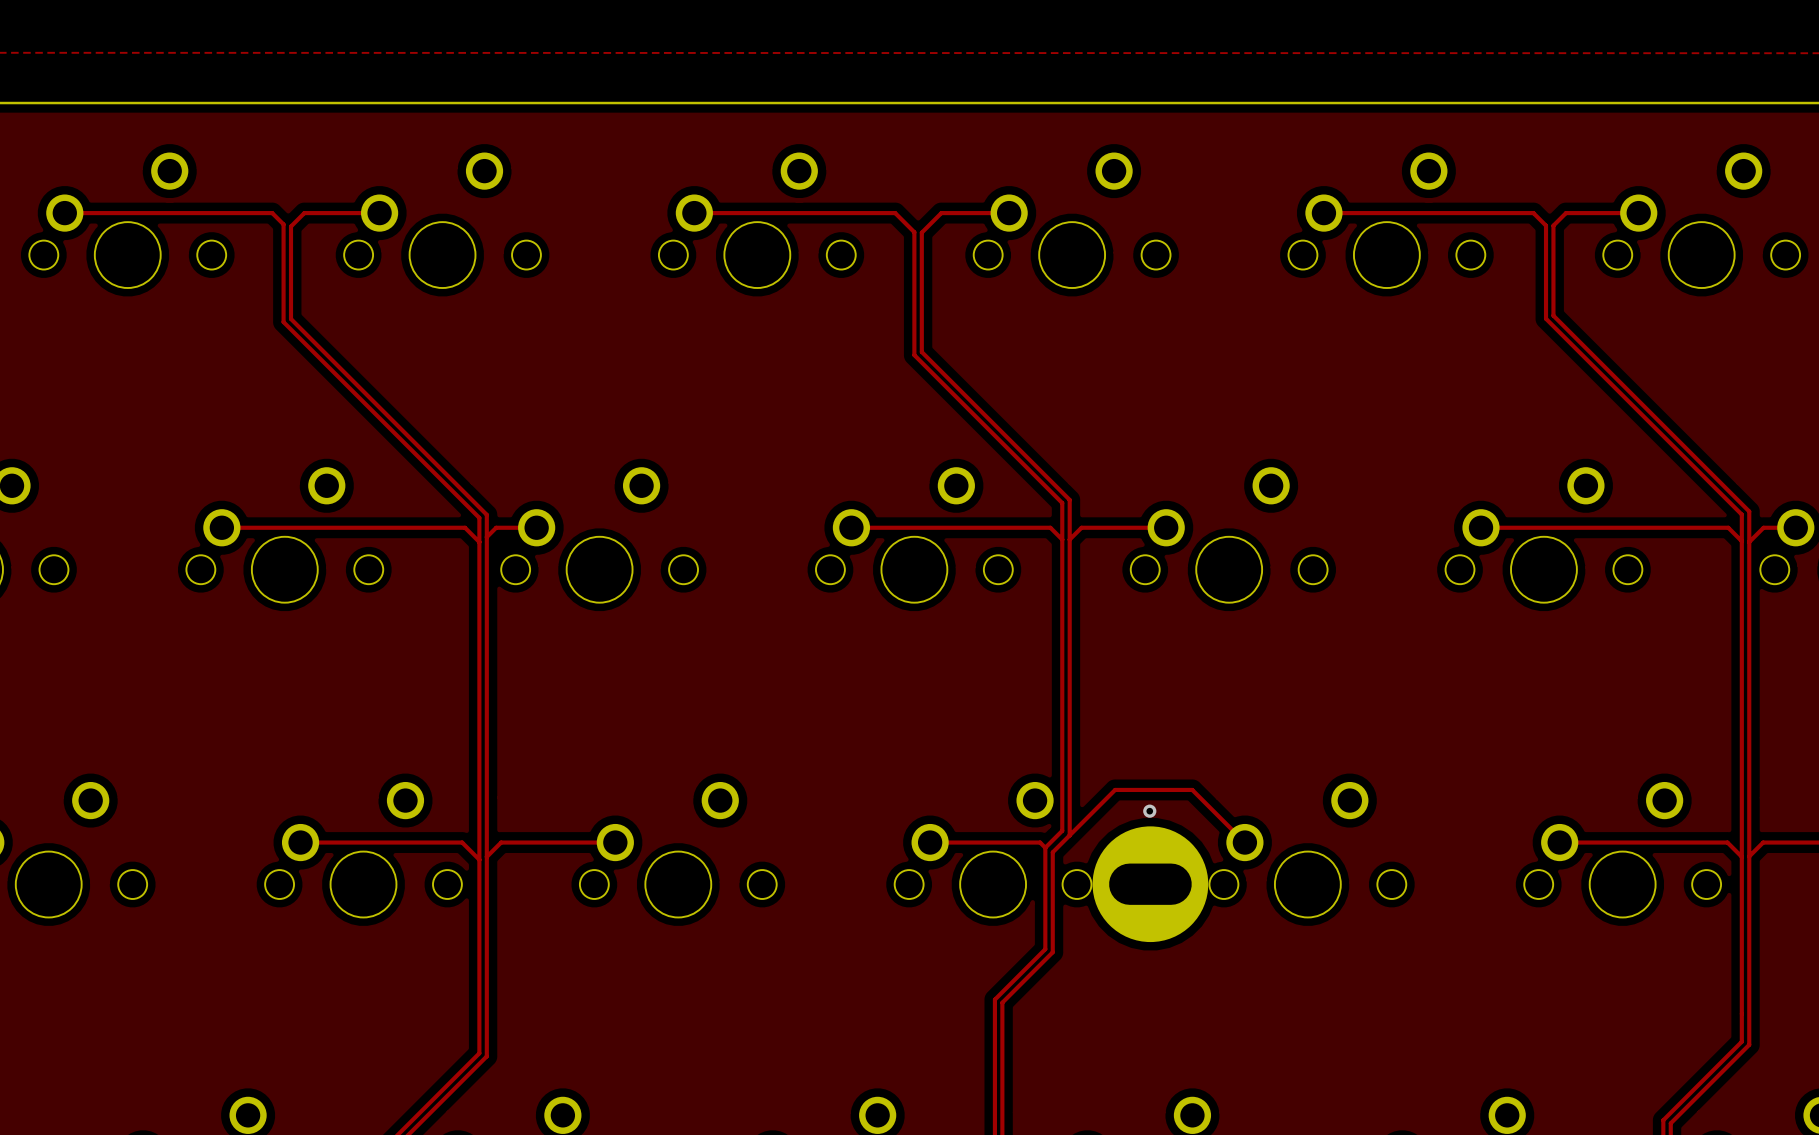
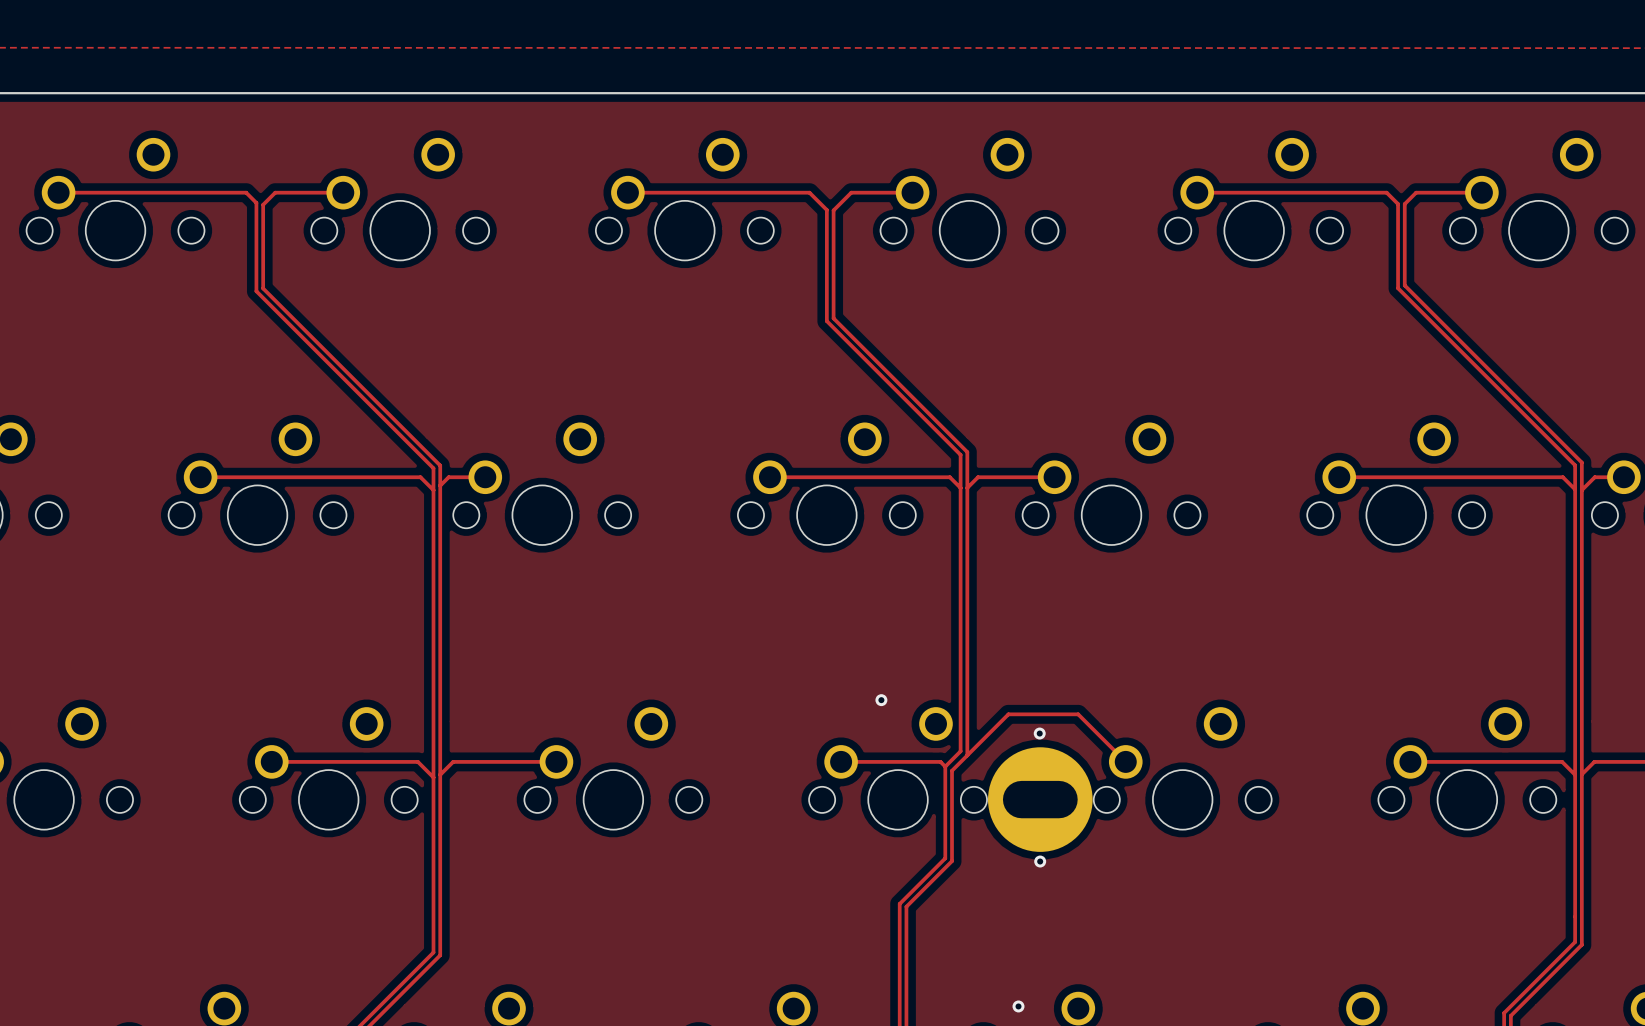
via: none -> (881, 700)
via: none -> (1040, 861)
via: none -> (1018, 1006)

